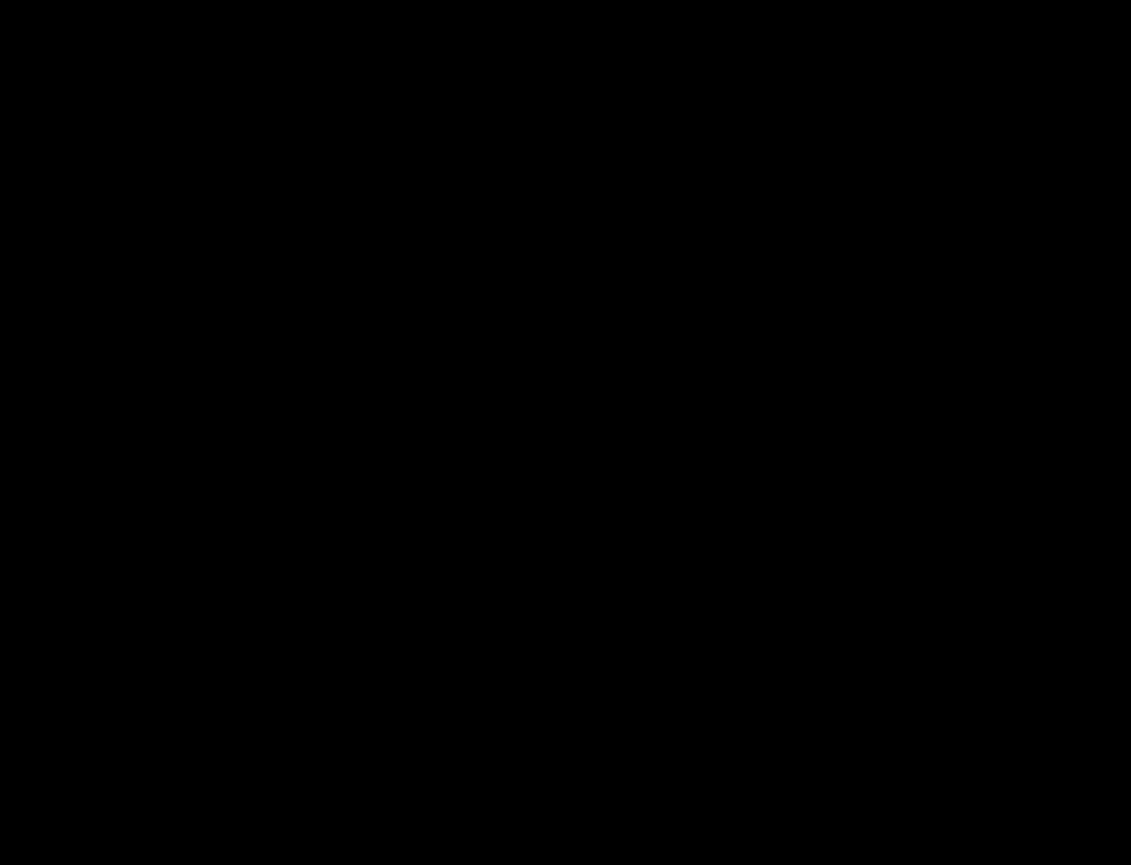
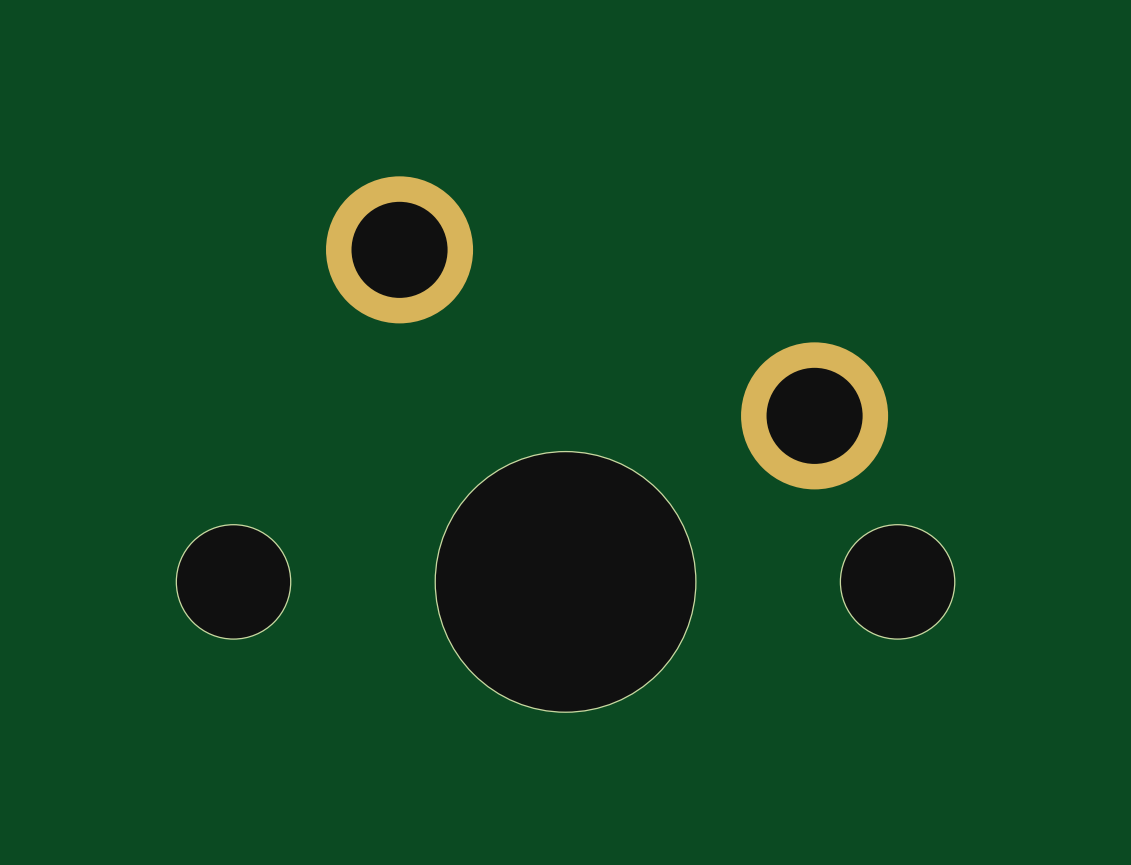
part: none -> (565, 444)

